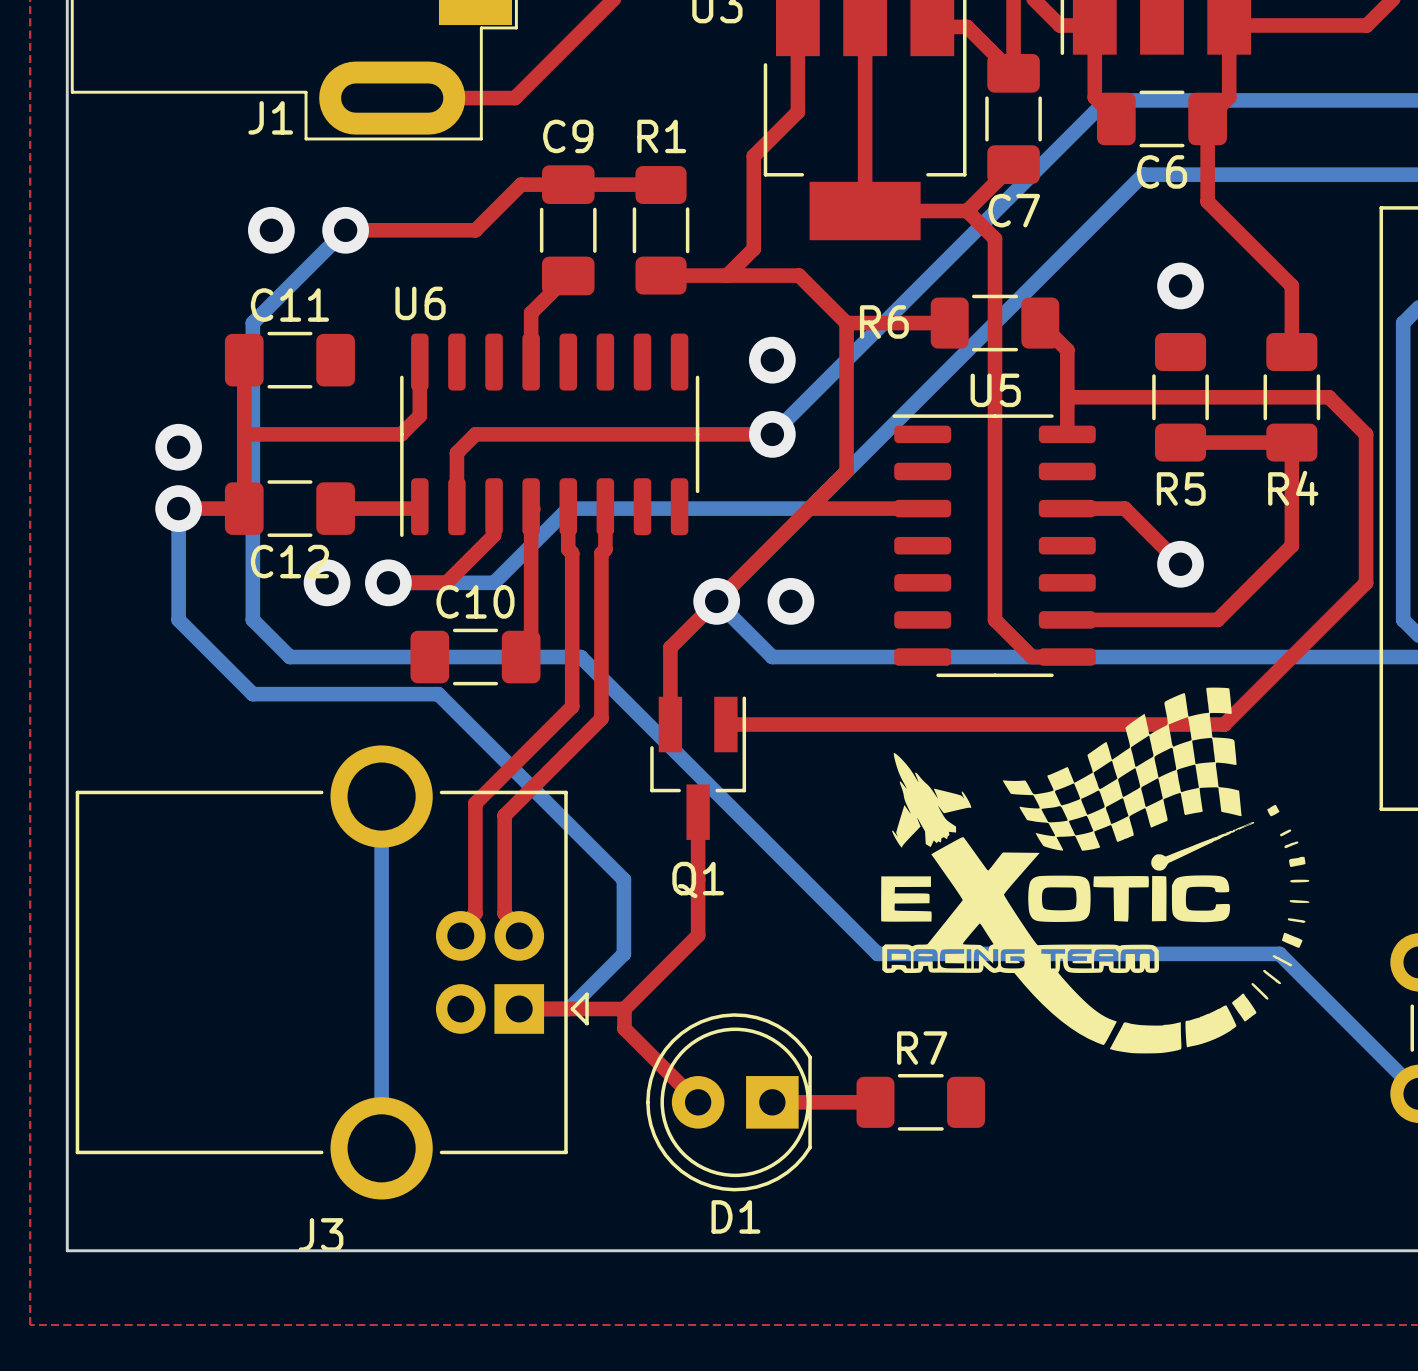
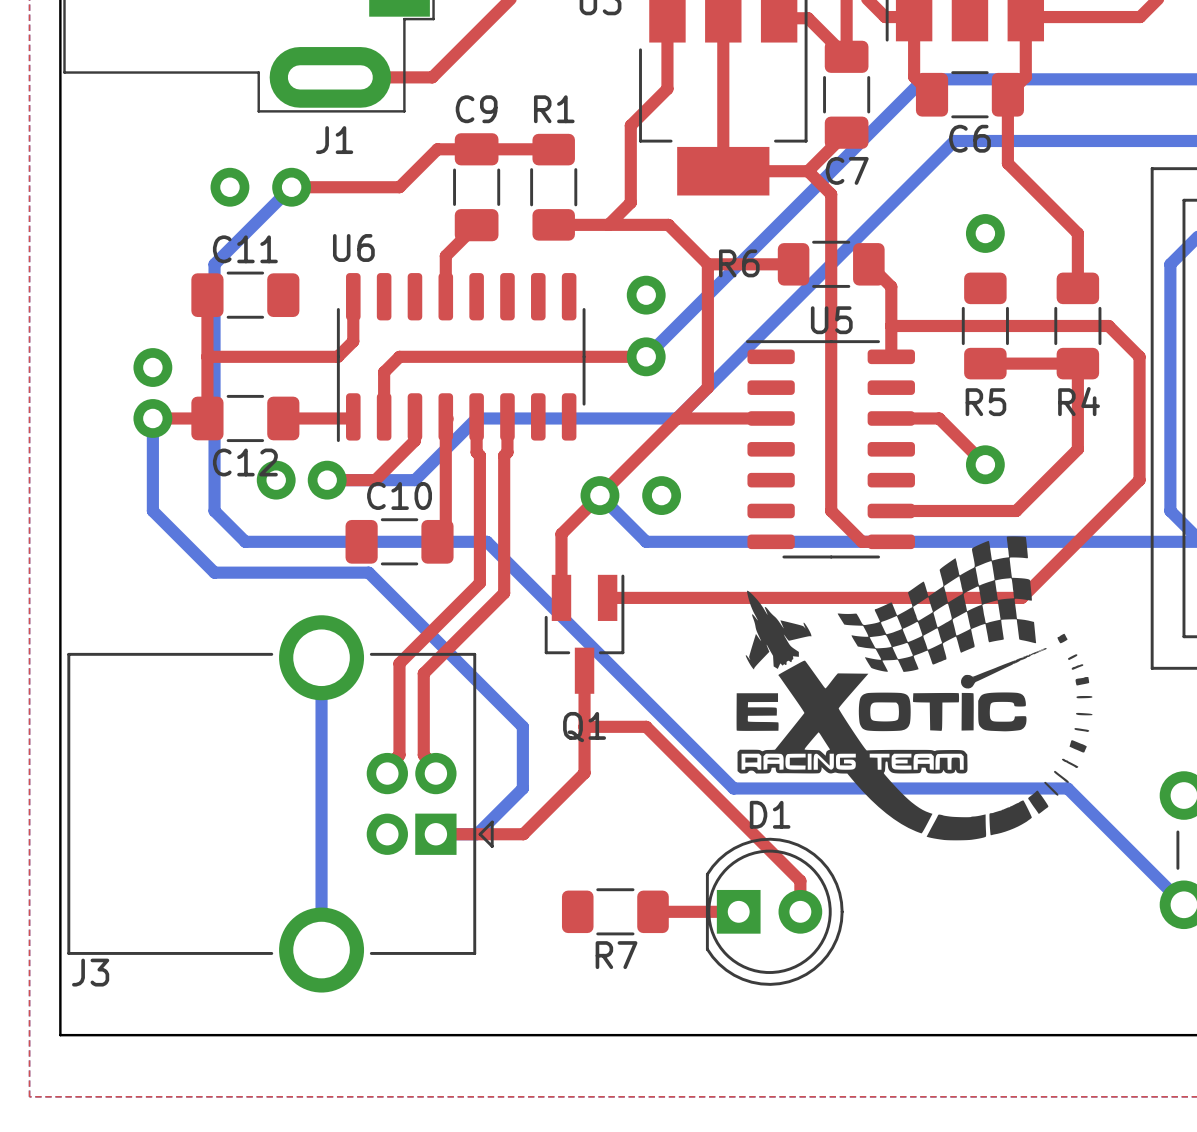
J1 name position: J1 (270, 117) -> J1 (334, 140)
drawing position: (1095, 870) -> (914, 688)
top track: none -> (584, 726) (646, 726) (800, 880) (800, 911)
top track: (624, 1008) (624, 1028) (698, 1102) -> none
R7 name position: R7 (922, 1048) -> R7 (616, 955)
D1 rotation: 0° (728, 1102) -> 180° (774, 911)
D1 position: (728, 1102) -> (774, 911)
R7 position: (920, 1102) -> (615, 911)
J3 name position: J3 (321, 1234) -> J3 (90, 972)

